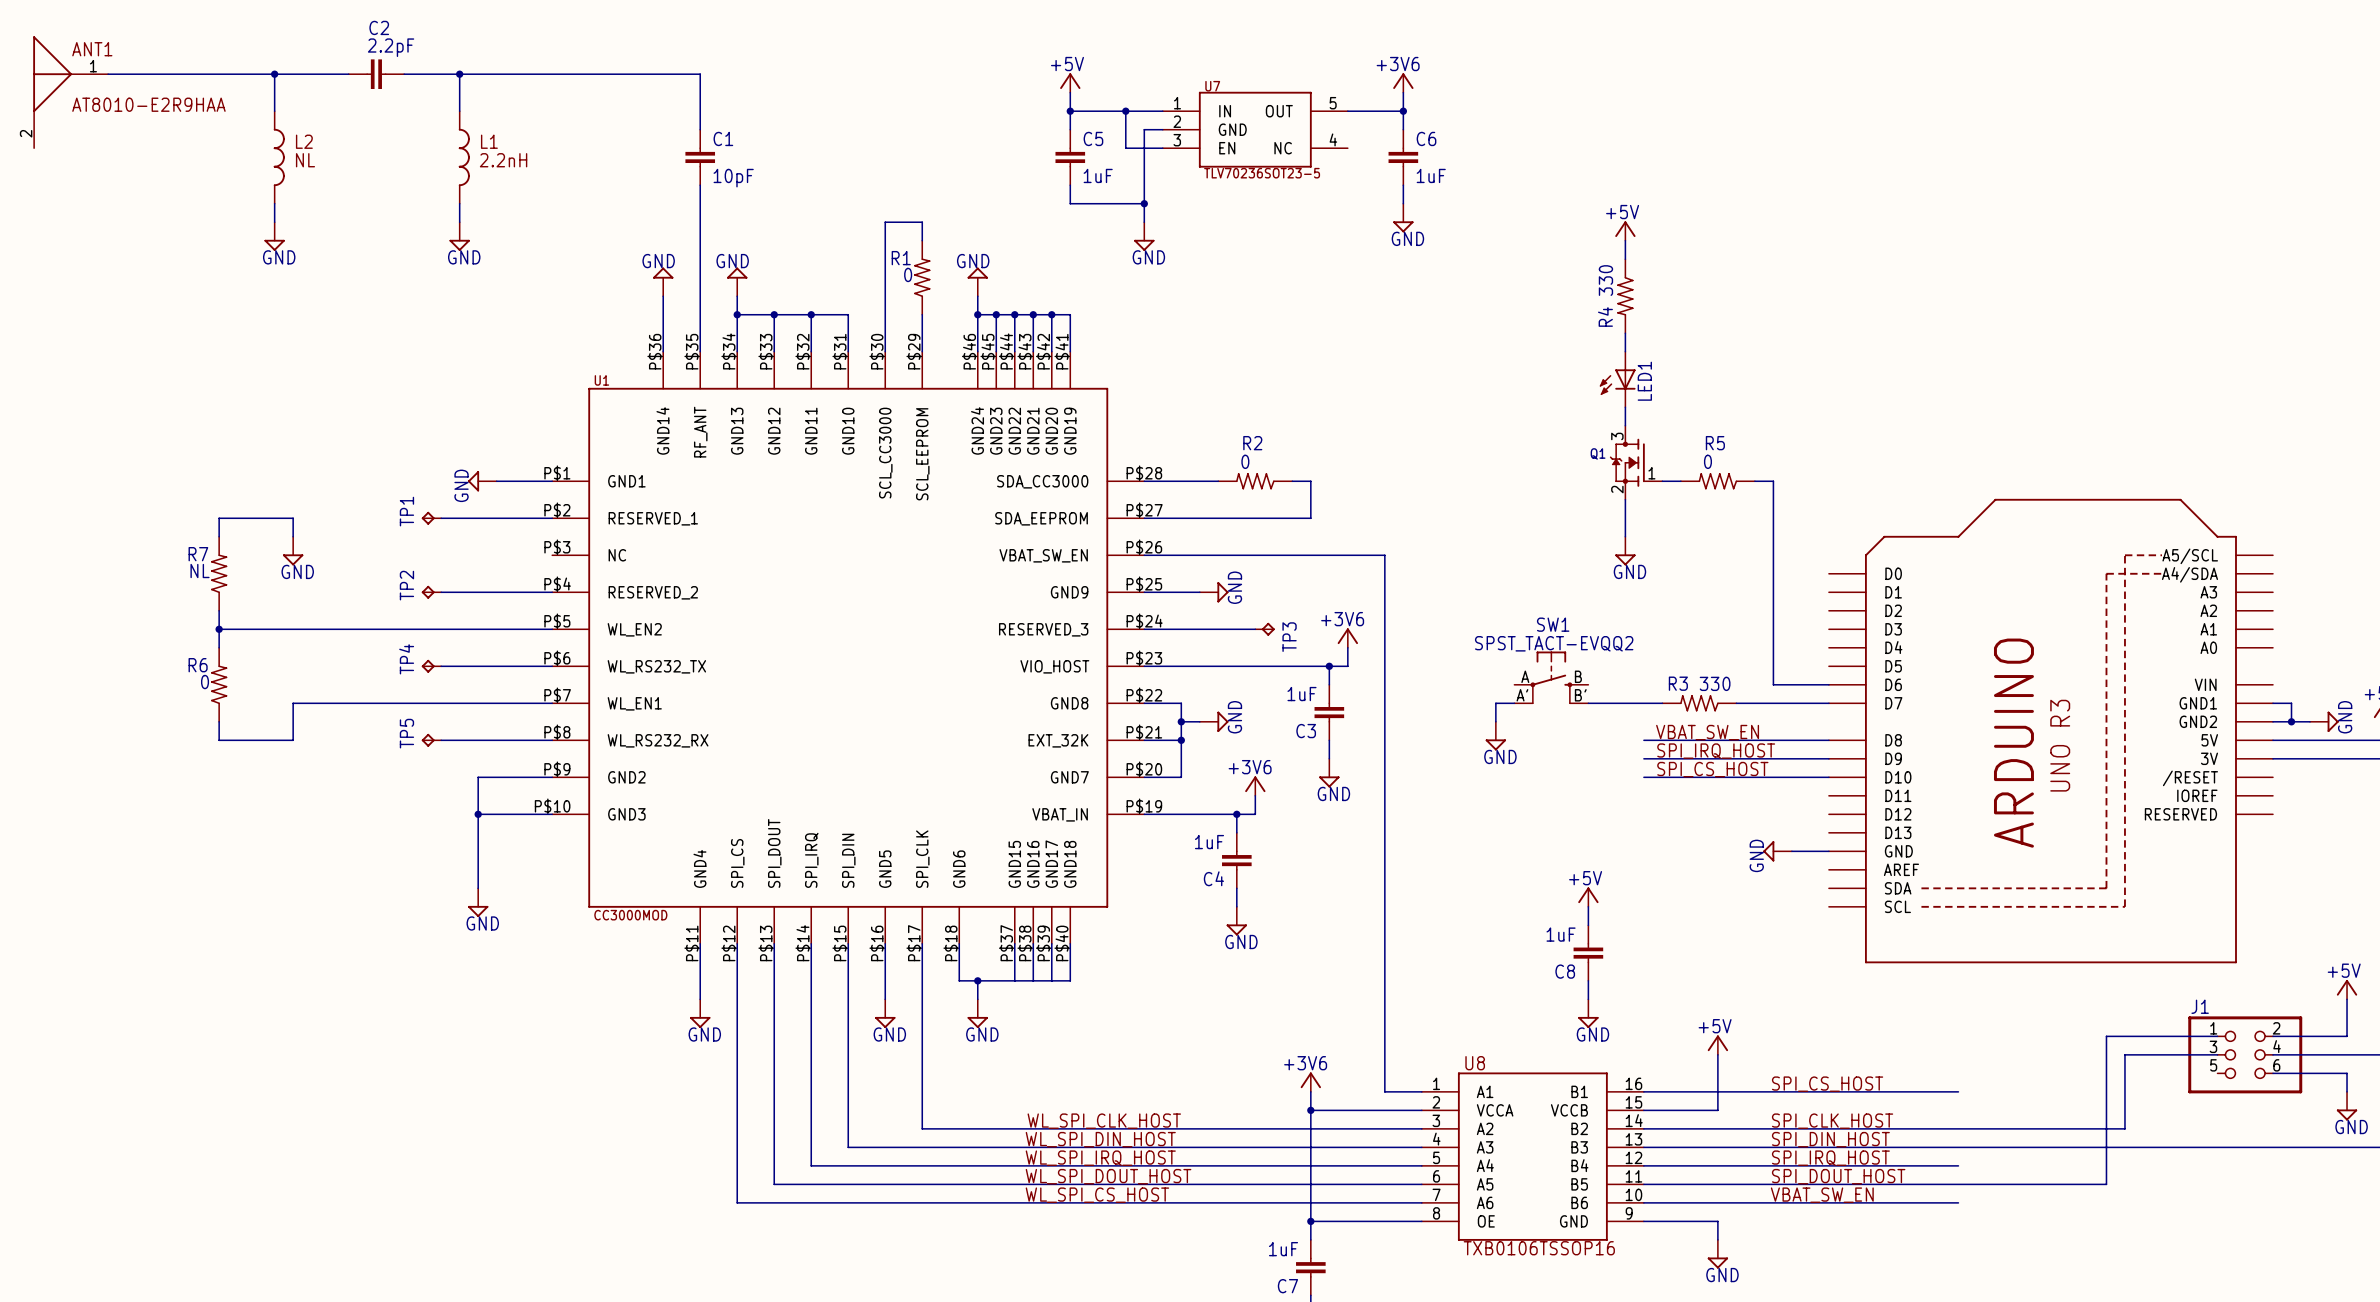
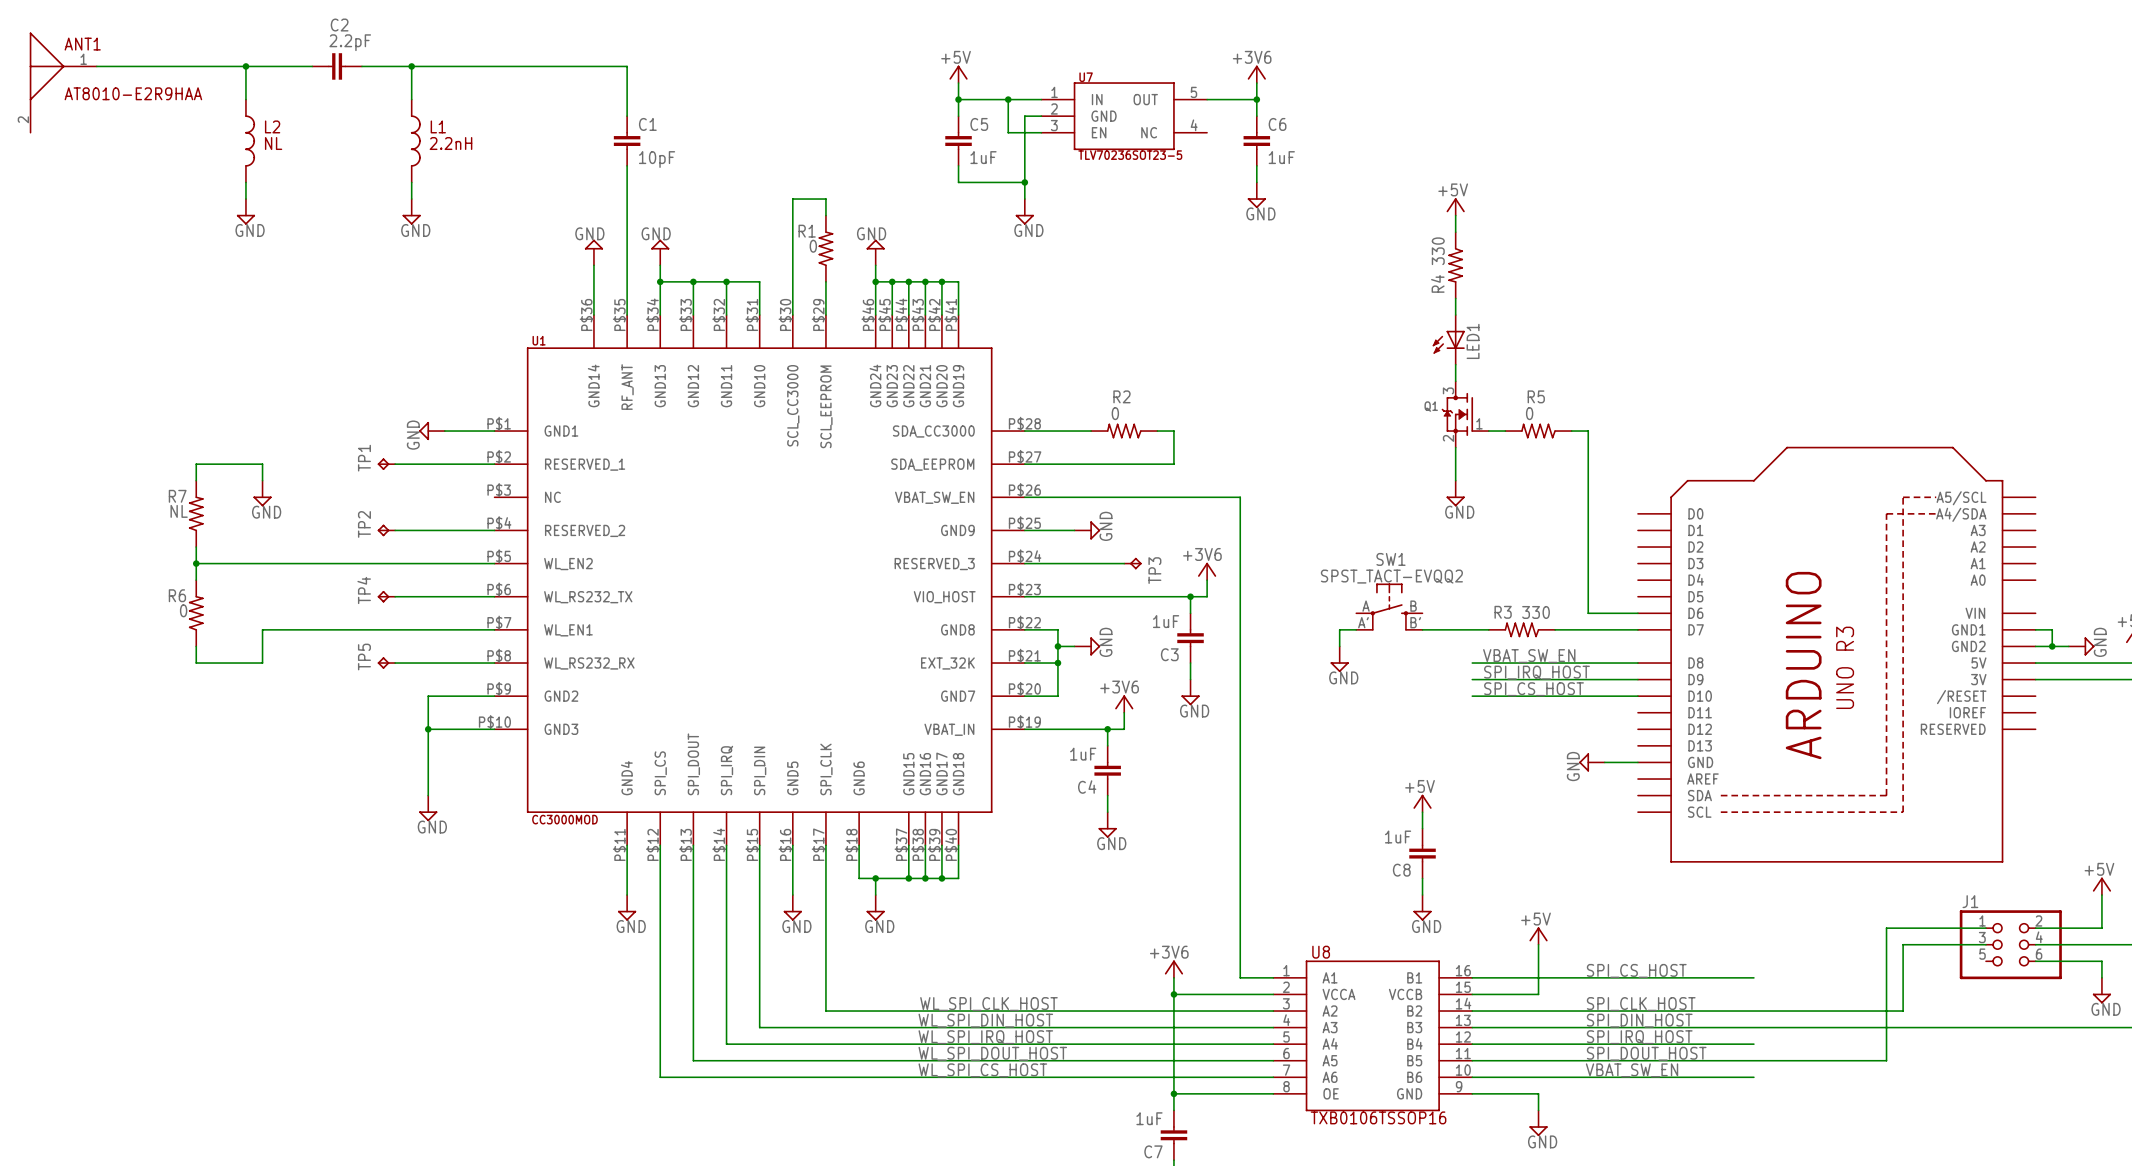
junction: none -> (908, 878)
junction: none -> (925, 878)
junction: none -> (941, 878)

